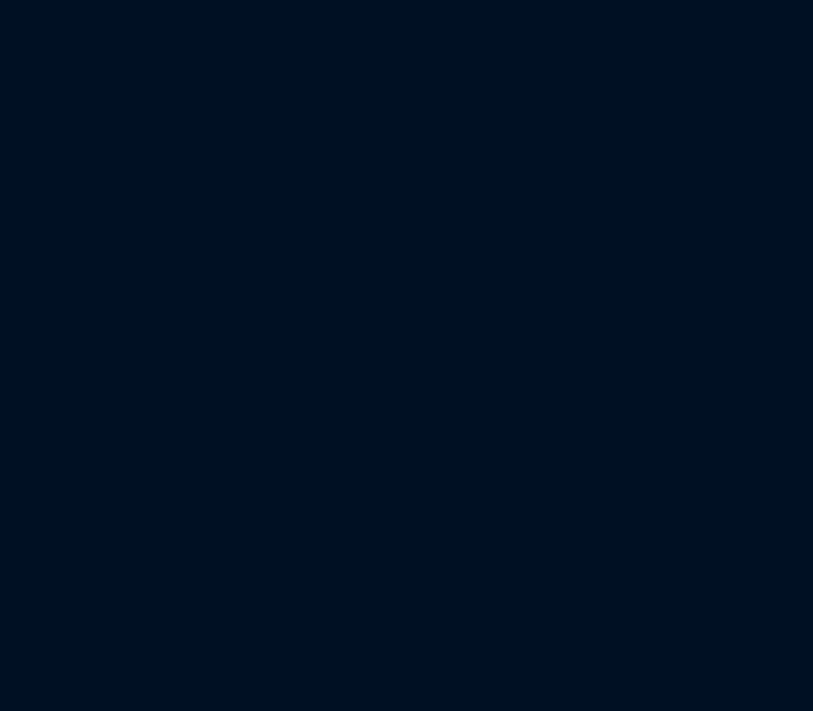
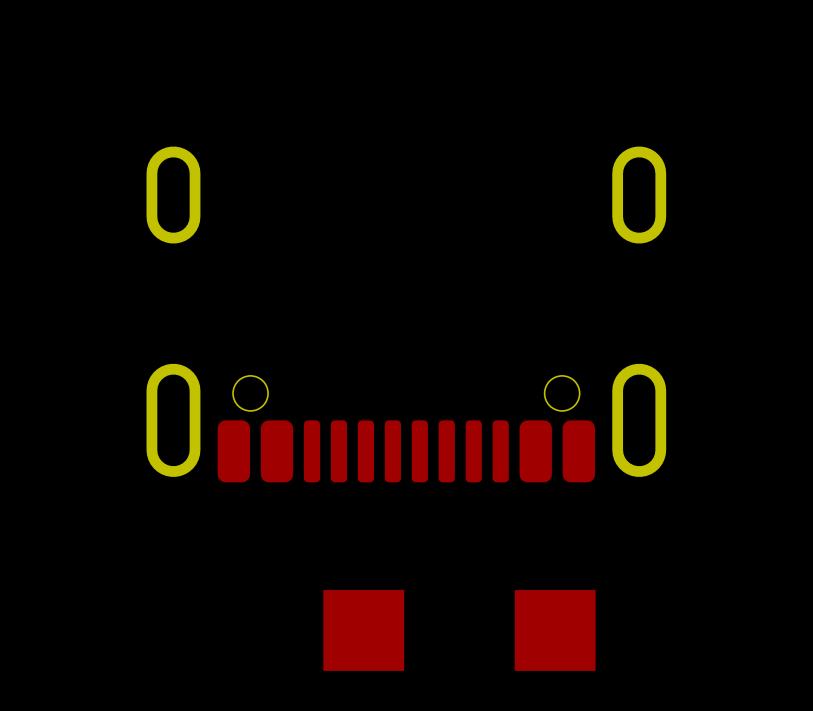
part: none -> (406, 314)
part: none -> (363, 630)
part: none -> (555, 630)

